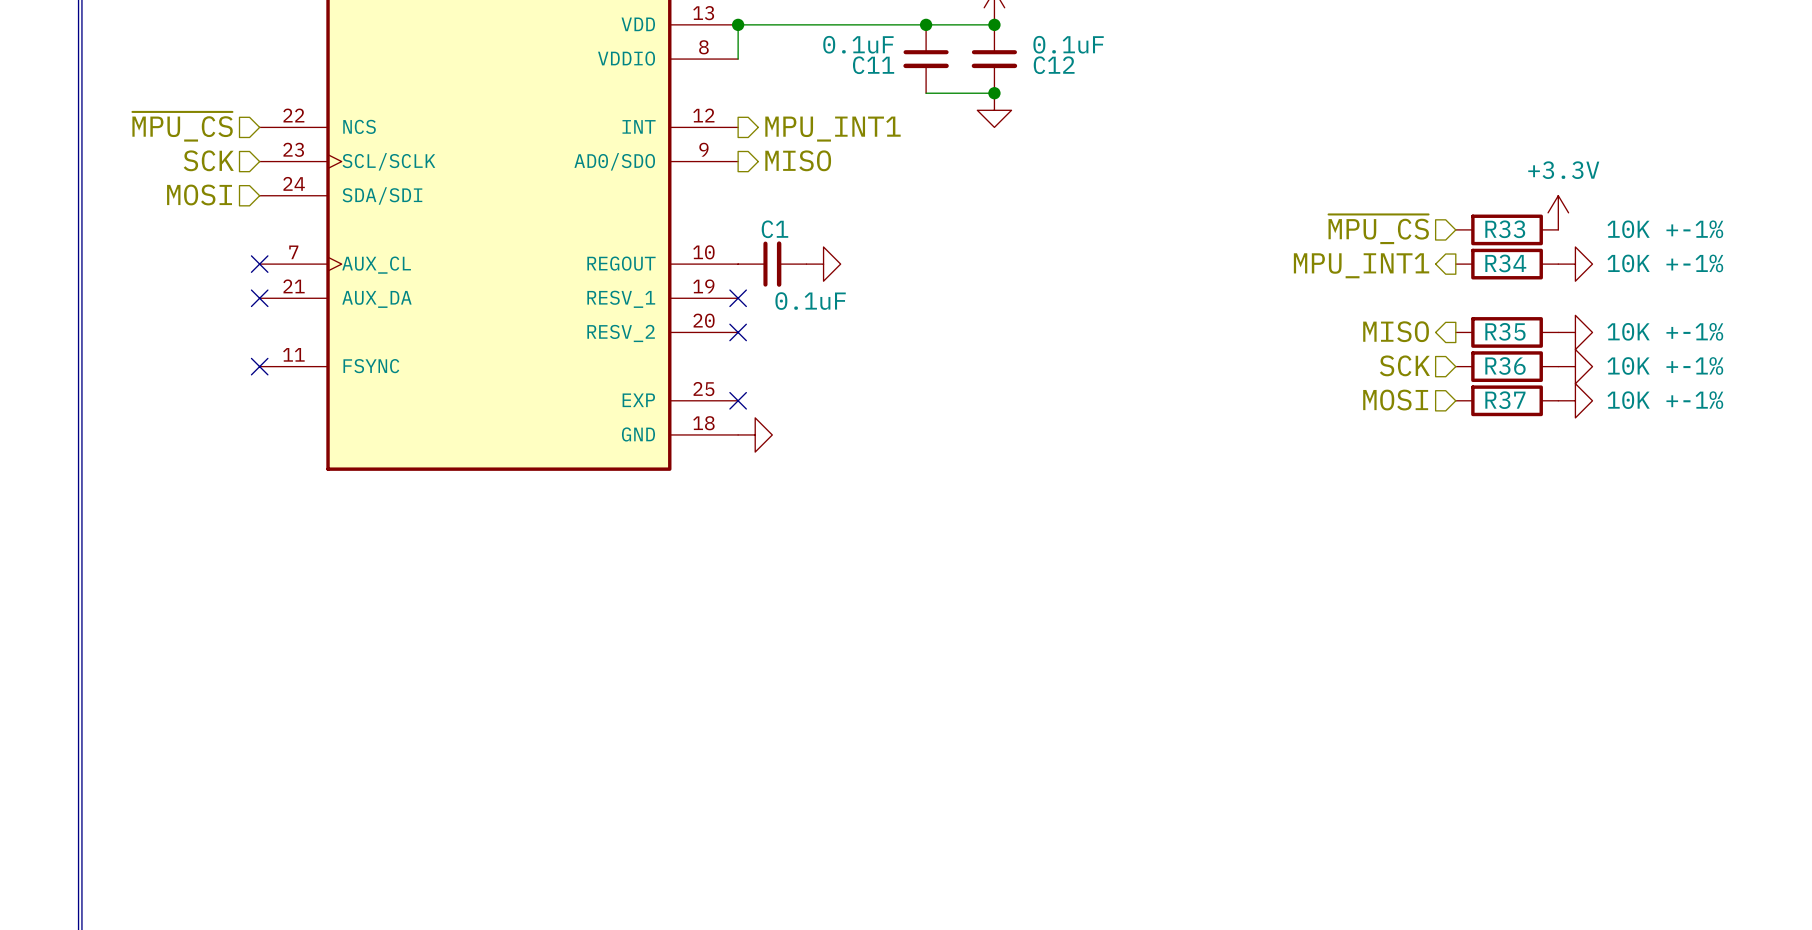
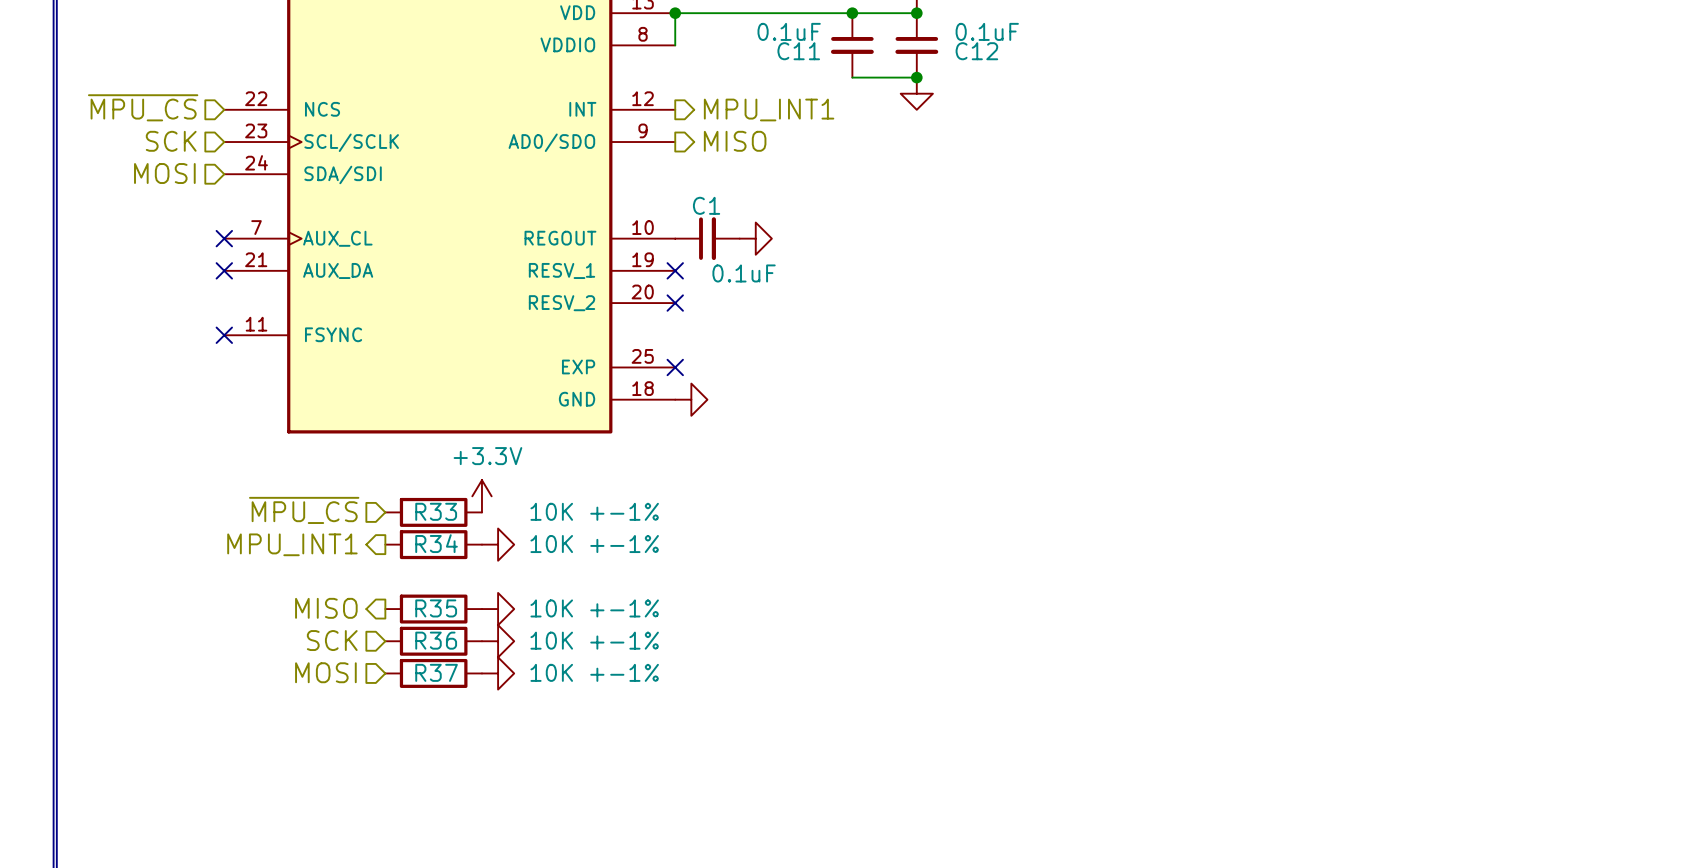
power symbol: +3.3V (1558, 212) -> none
hierarchical label: ~{MPU_CS} (1378, 229) -> none
R33 position: (1507, 229) -> (433, 512)
R34 position: (1507, 264) -> (433, 544)
power symbol: (1575, 264) -> none
hierarchical label: MPU_INT1 (1361, 265) -> none
hierarchical label: MISO (1396, 331) -> none
R35 position: (1507, 332) -> (433, 609)
power symbol: (1575, 332) -> none
hierarchical label: SCK (1404, 365) -> none
R36 position: (1507, 366) -> (433, 641)
power symbol: (1575, 366) -> none
hierarchical label: MOSI (1395, 400) -> none
R37 position: (1507, 400) -> (433, 673)
power symbol: (1575, 400) -> none
power symbol: none -> +3.3V (481, 496)
hierarchical label: none -> ~{MPU_CS} (304, 510)
power symbol: none -> (498, 544)
hierarchical label: none -> MPU_INT1 (292, 544)
hierarchical label: none -> MISO (326, 608)
power symbol: none -> (498, 609)
hierarchical label: none -> SCK (332, 640)
power symbol: none -> (498, 641)
hierarchical label: none -> MOSI (325, 672)
power symbol: none -> (498, 673)

